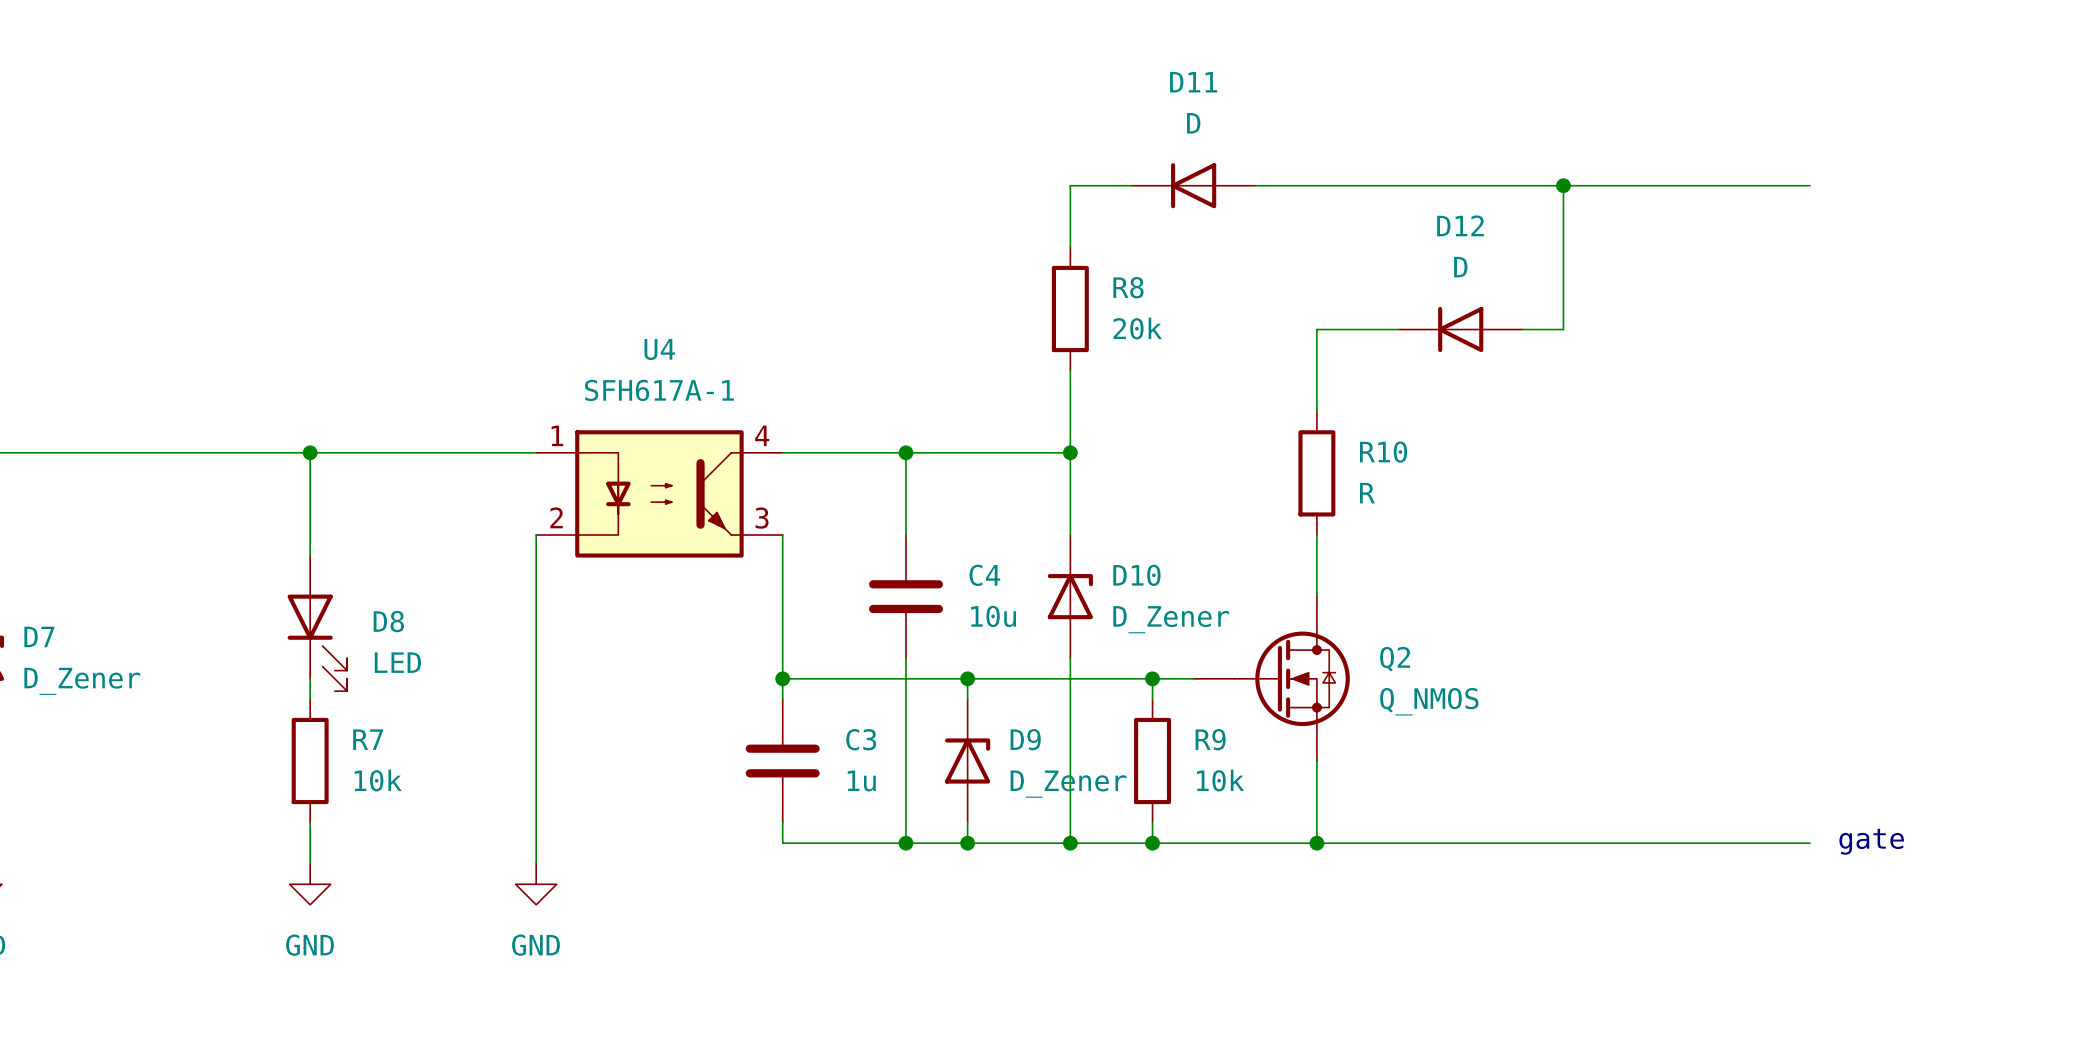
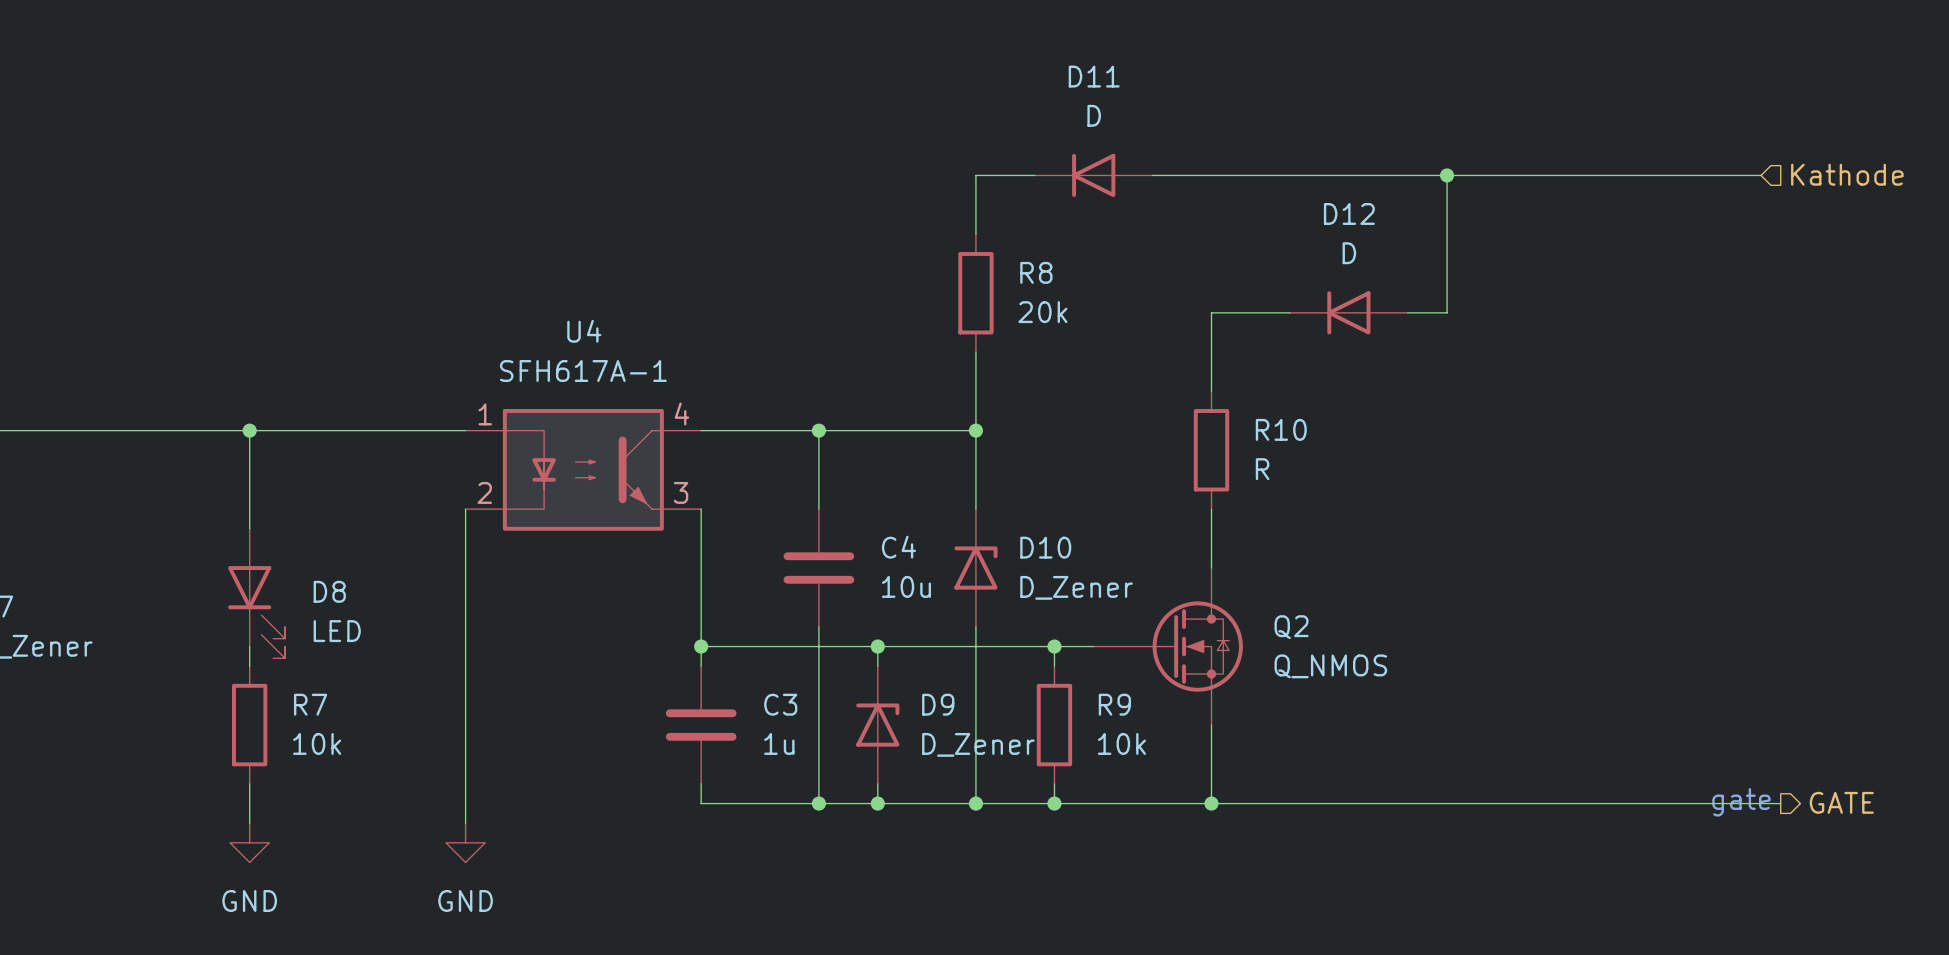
hierarchical label: none -> Kathode (1847, 174)
wire: none -> (1682, 175) (1761, 175)
hierarchical label: none -> GATE (1841, 802)
wire: none -> (1682, 803) (1780, 803)

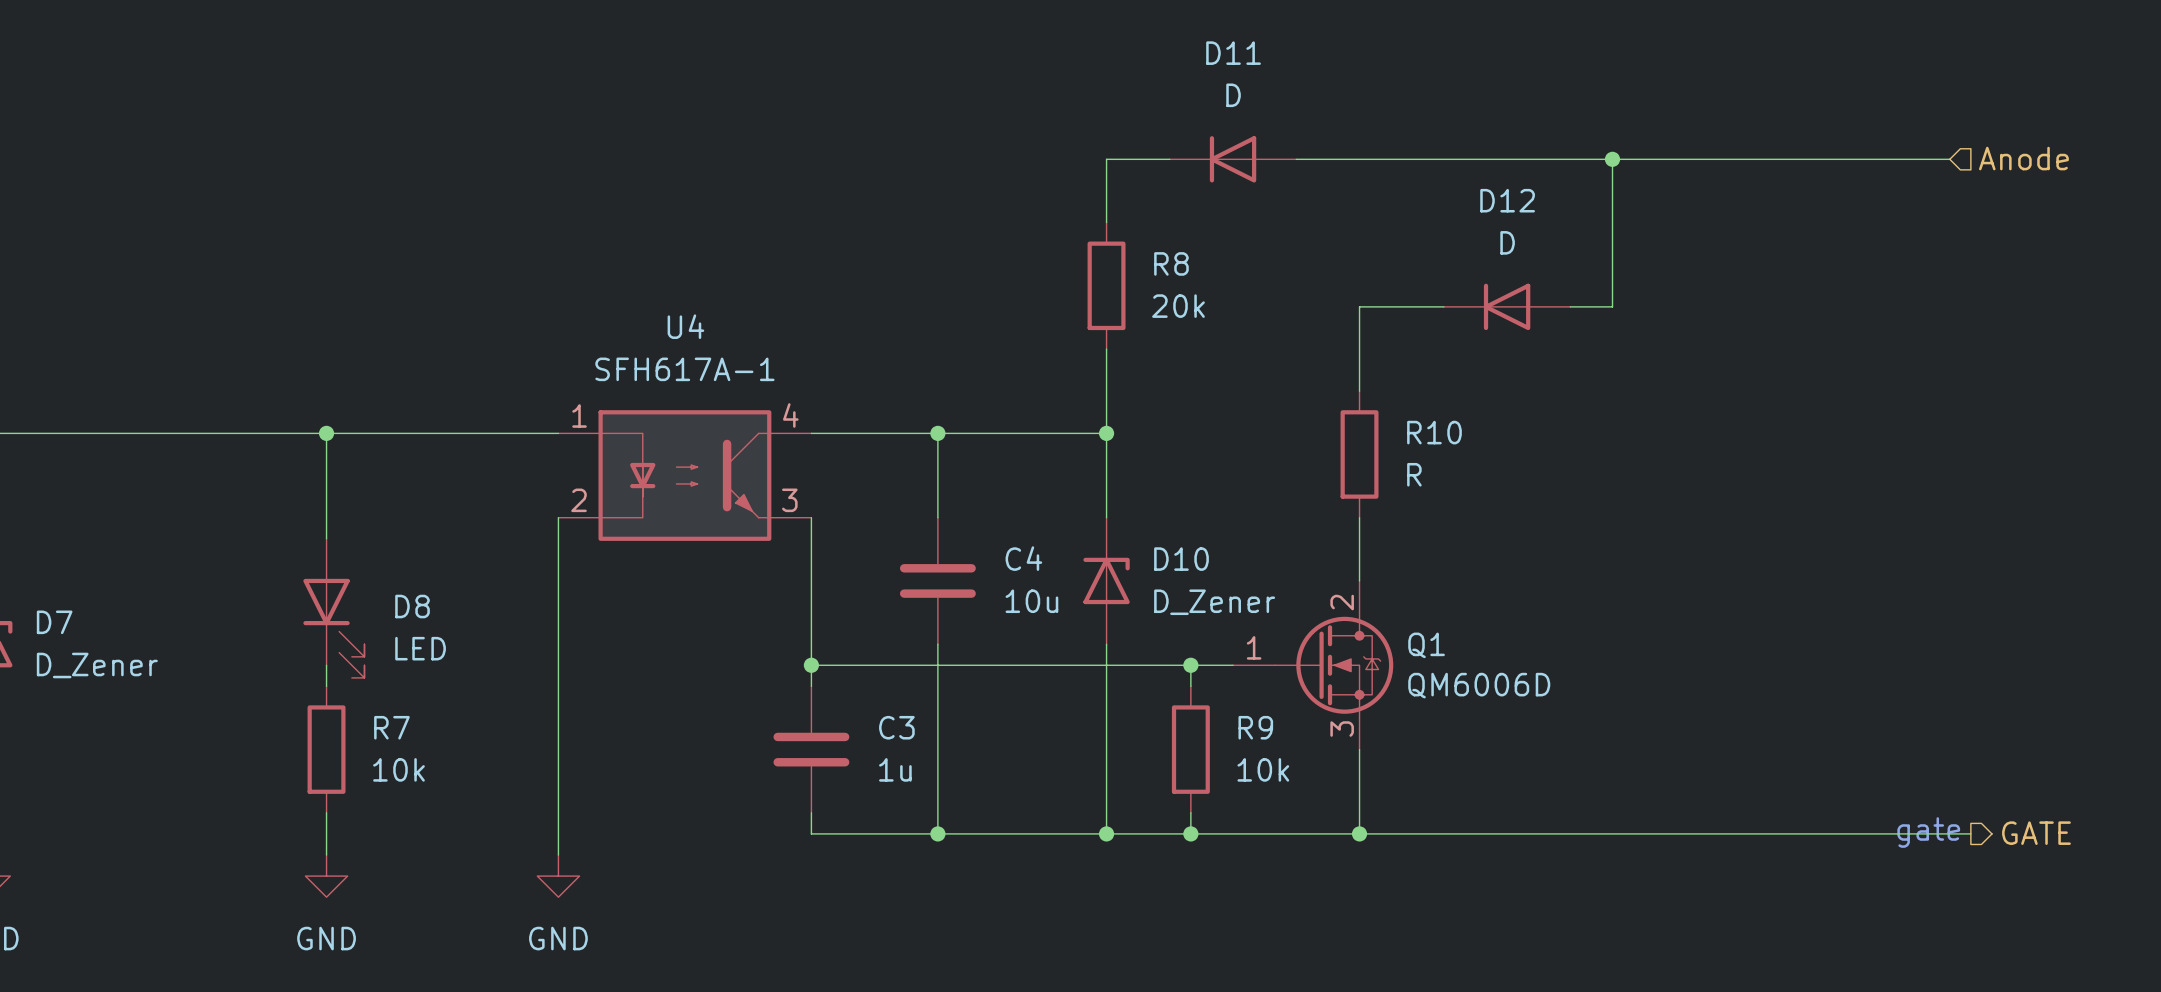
hierarchical label: Kathode (1847, 174) -> Anode (2023, 158)
wire: (877, 646) (877, 666) -> none
junction: (877, 646) -> none
Q2: Q_NMOS (1168, 646) -> none
Q1: none -> QM6006D (1313, 665)
D9: D_Zener (877, 725) -> none
wire: (877, 783) (877, 803) -> none
junction: (877, 803) -> none

